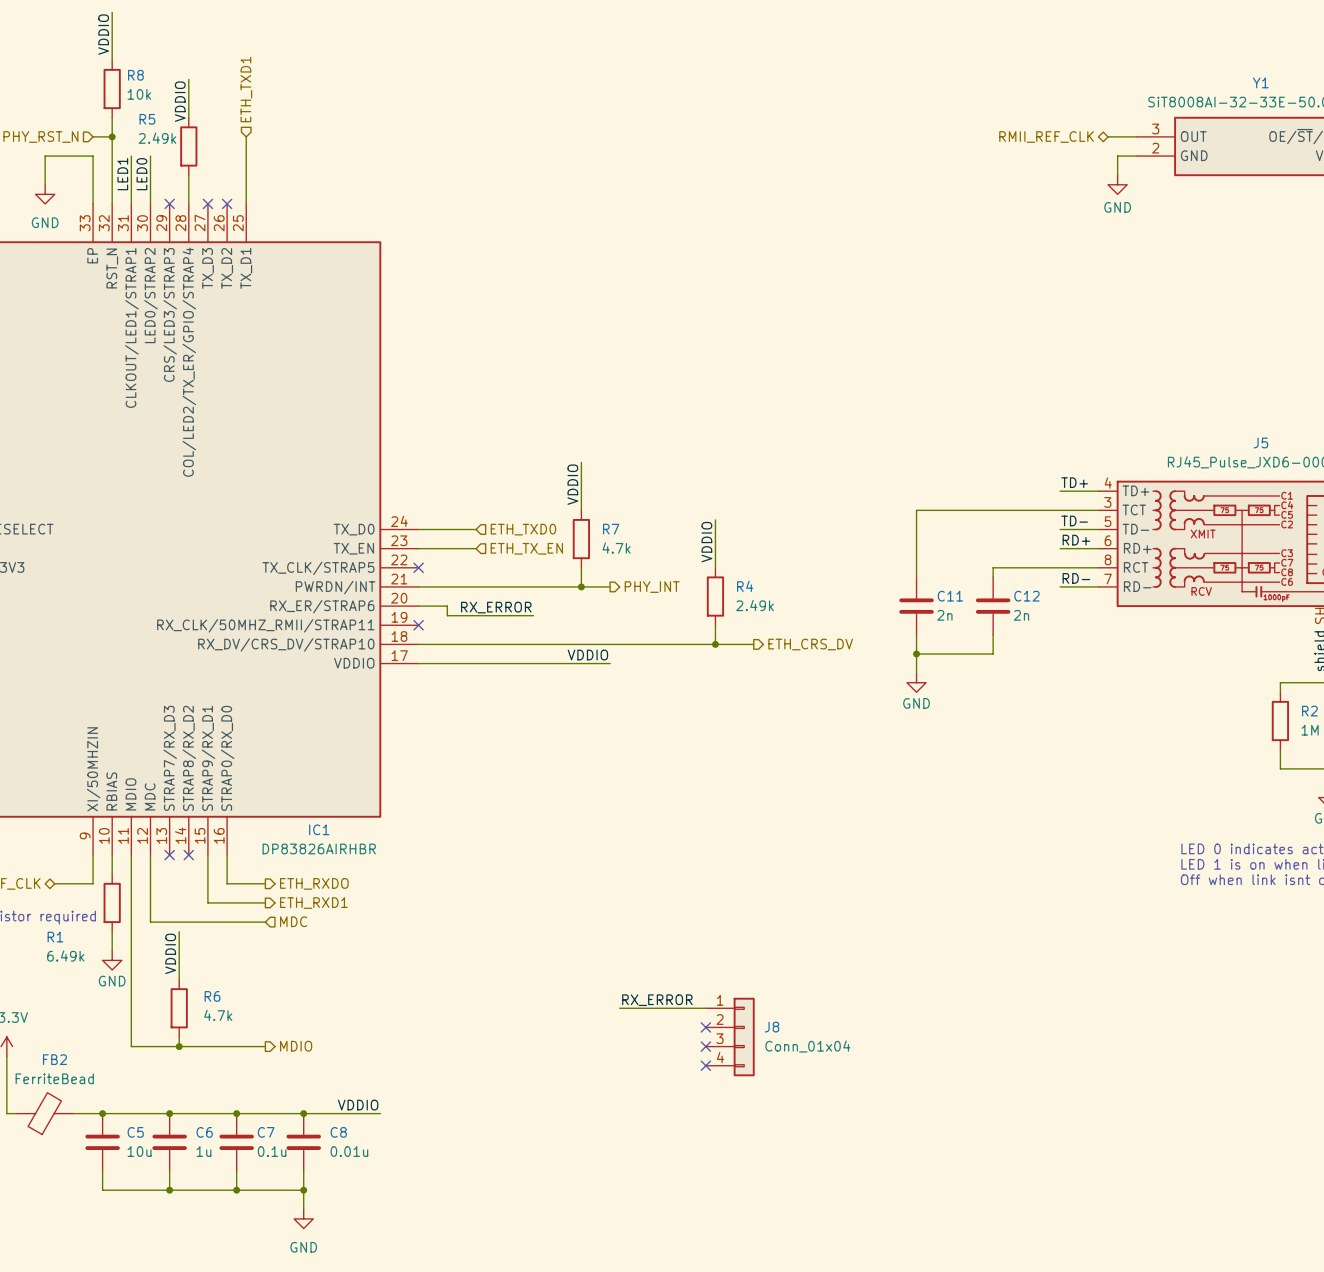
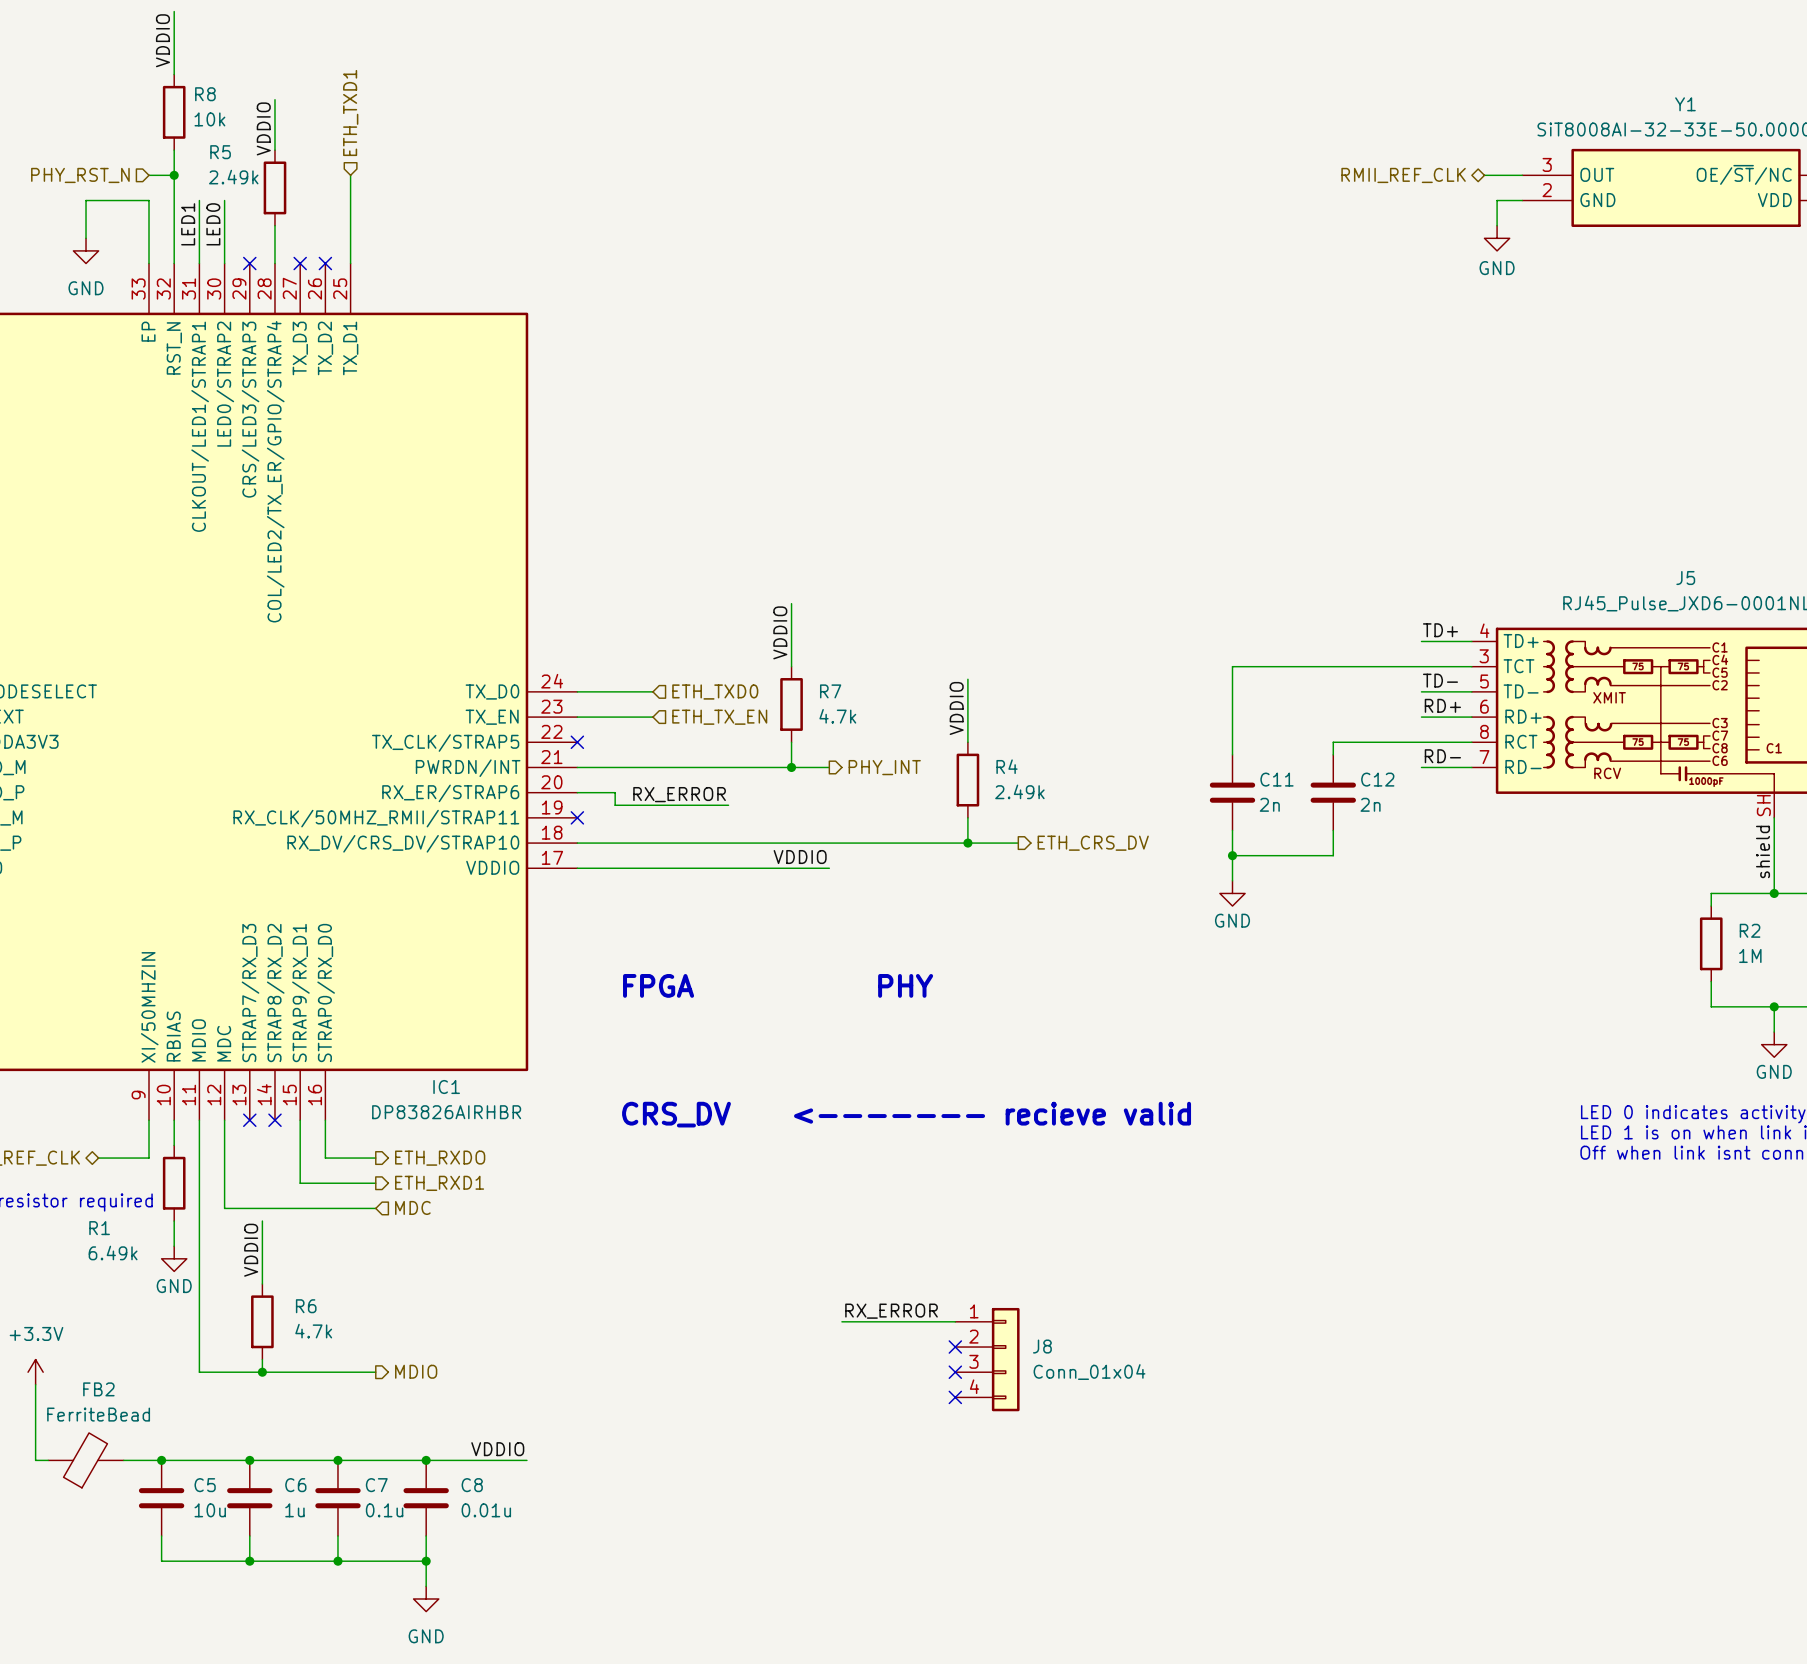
text: none -> FPGA PHY (778, 985)
text: none -> CRS_DV <------- recieve valid (906, 1114)

